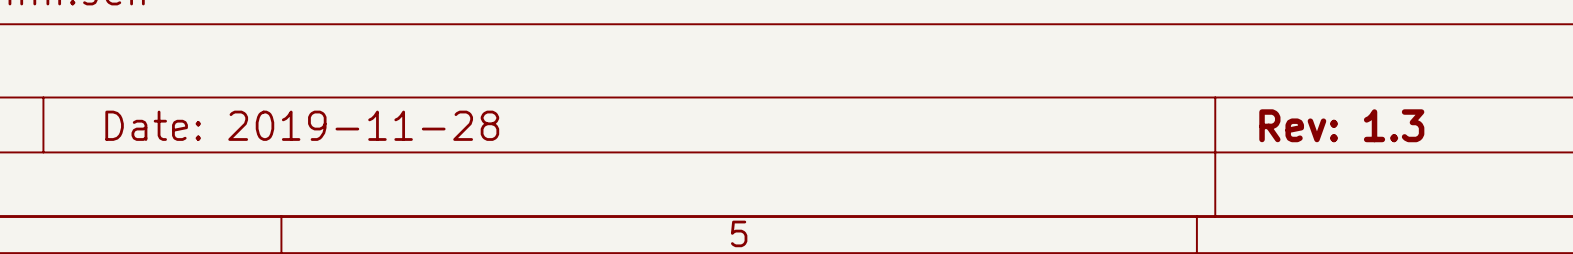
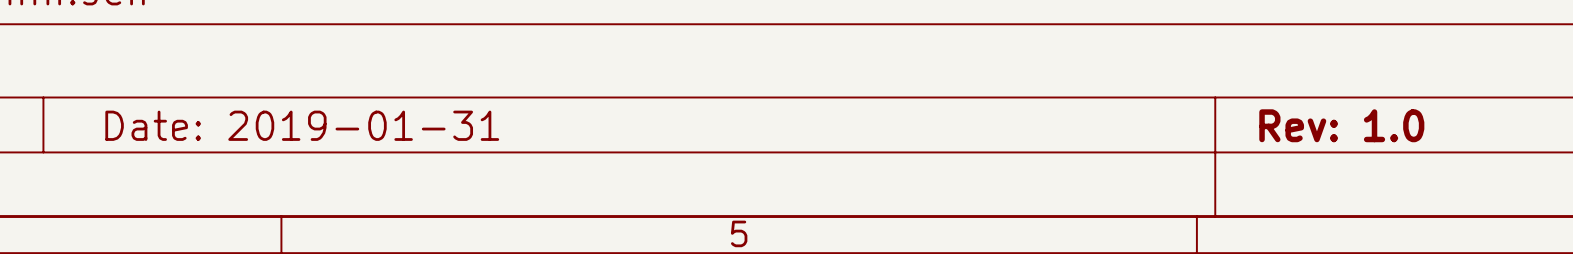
title block: Date: 2019-11-28 (302, 125) -> Date: 2019-01-31 (302, 125)
title block: Rev: 1.3 (1341, 125) -> Rev: 1.0 (1341, 125)

